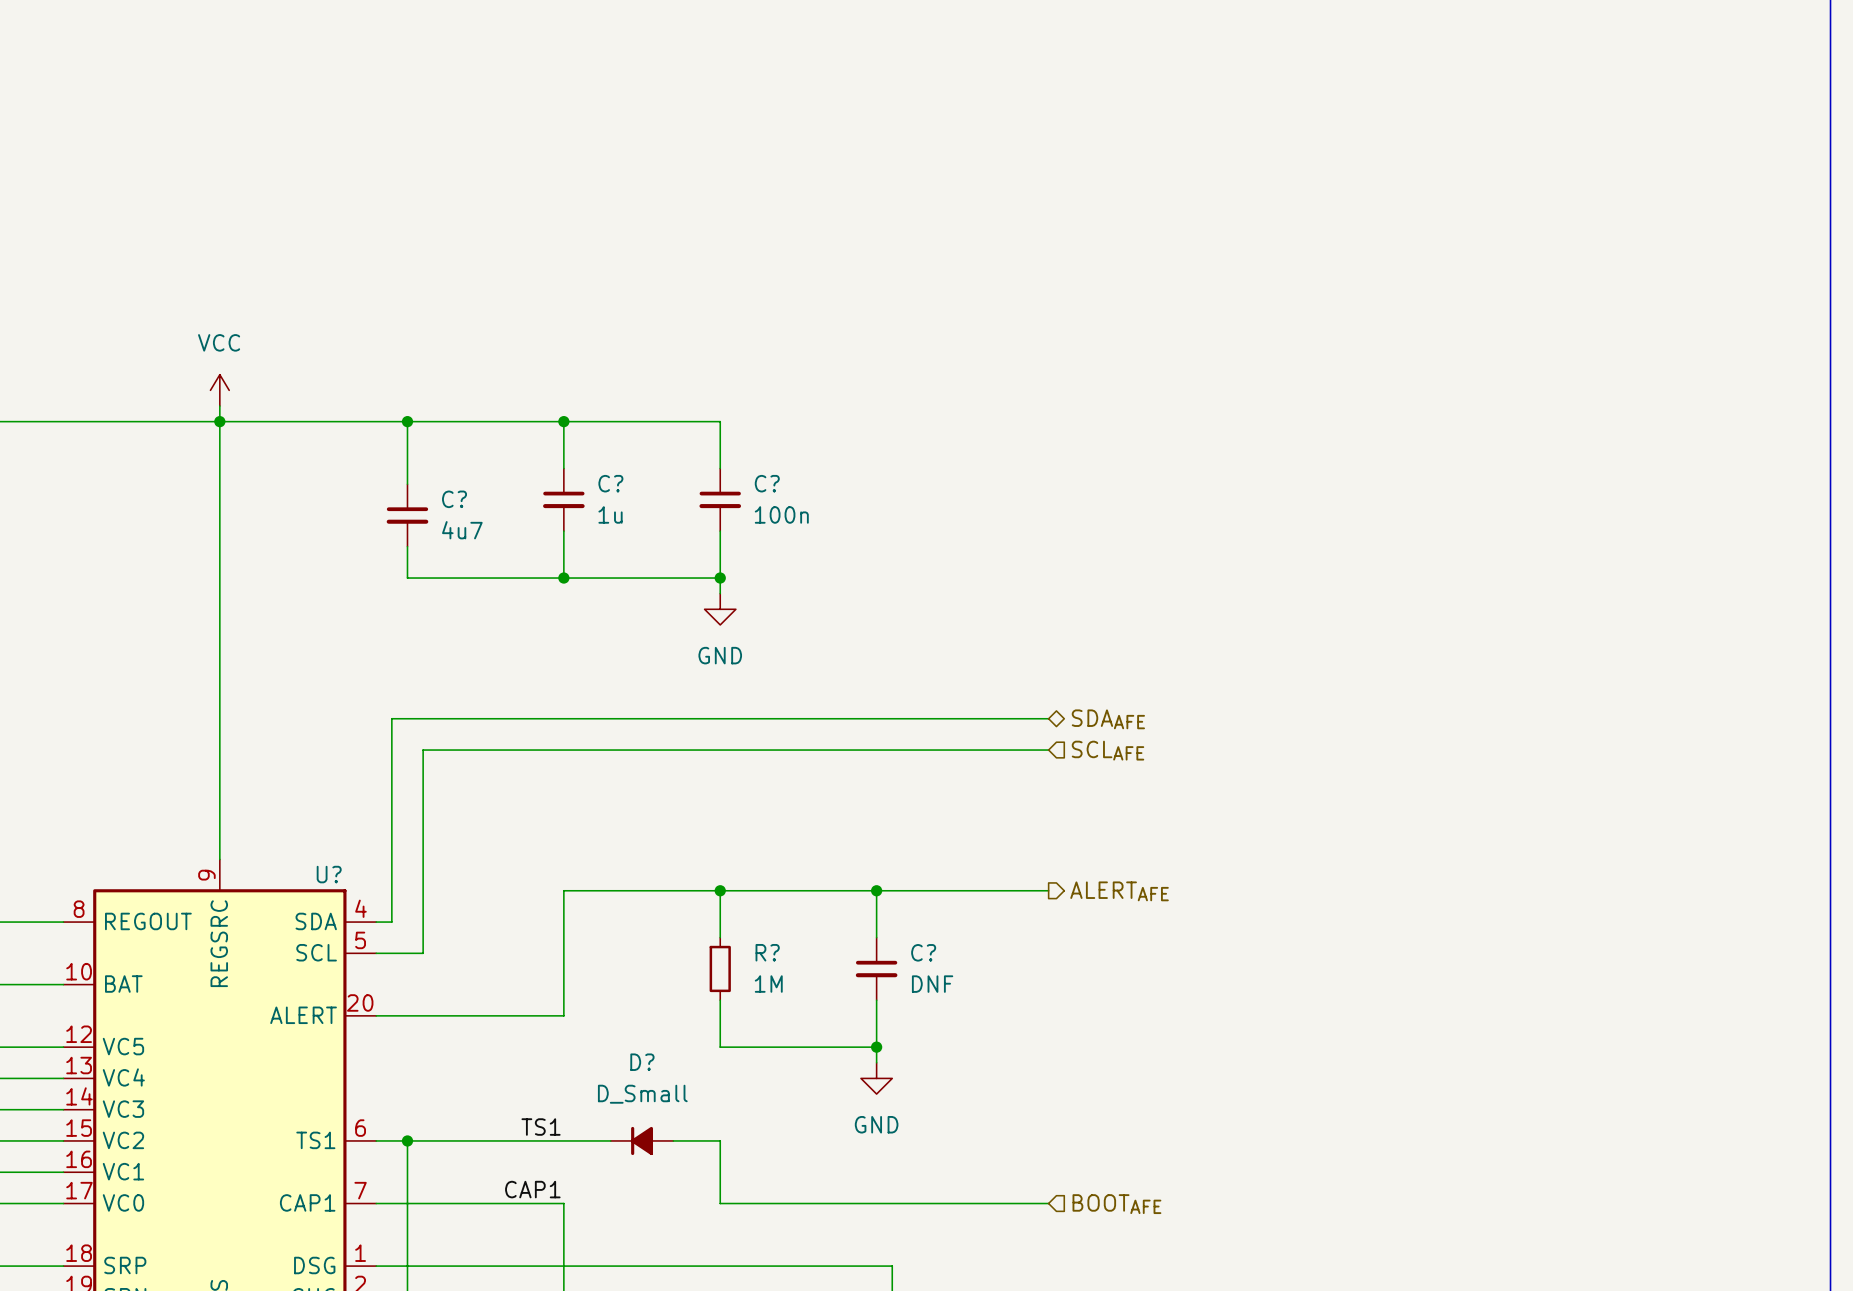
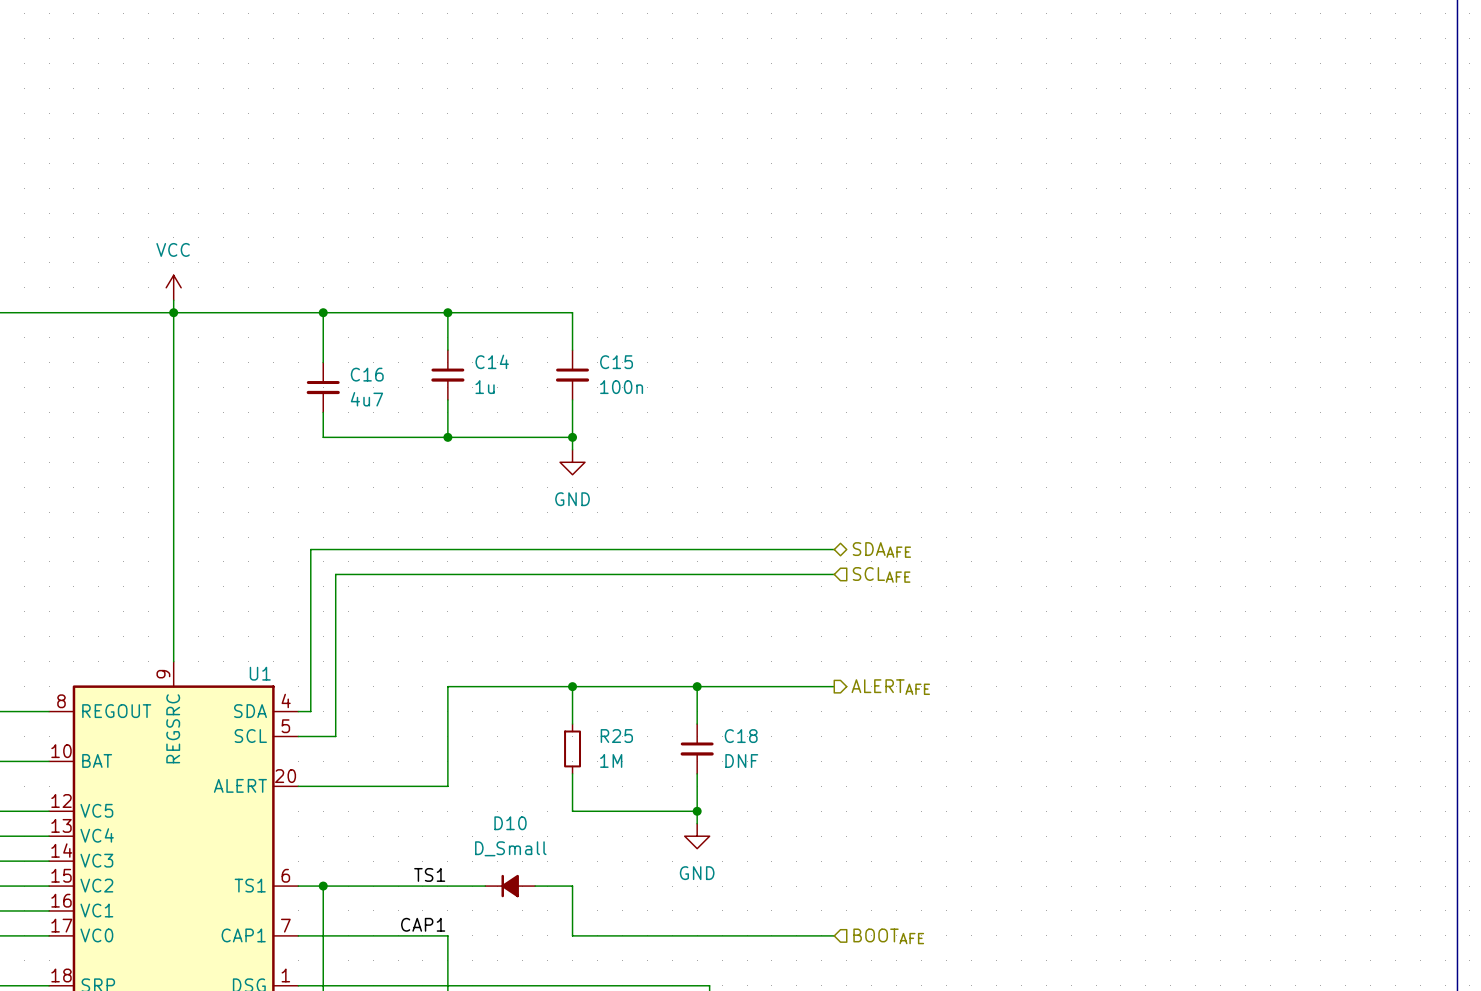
C? name: C? (610, 483) -> C14 (492, 361)
C? name: C? (767, 483) -> C15 (616, 362)
C? name: C? (454, 499) -> C16 (367, 374)
U? name: U? (329, 874) -> U1 (260, 673)
R? name: R? (767, 952) -> R25 (616, 736)
C? name: C? (923, 952) -> C18 (741, 736)
D? name: D? (642, 1062) -> D10 (510, 823)

